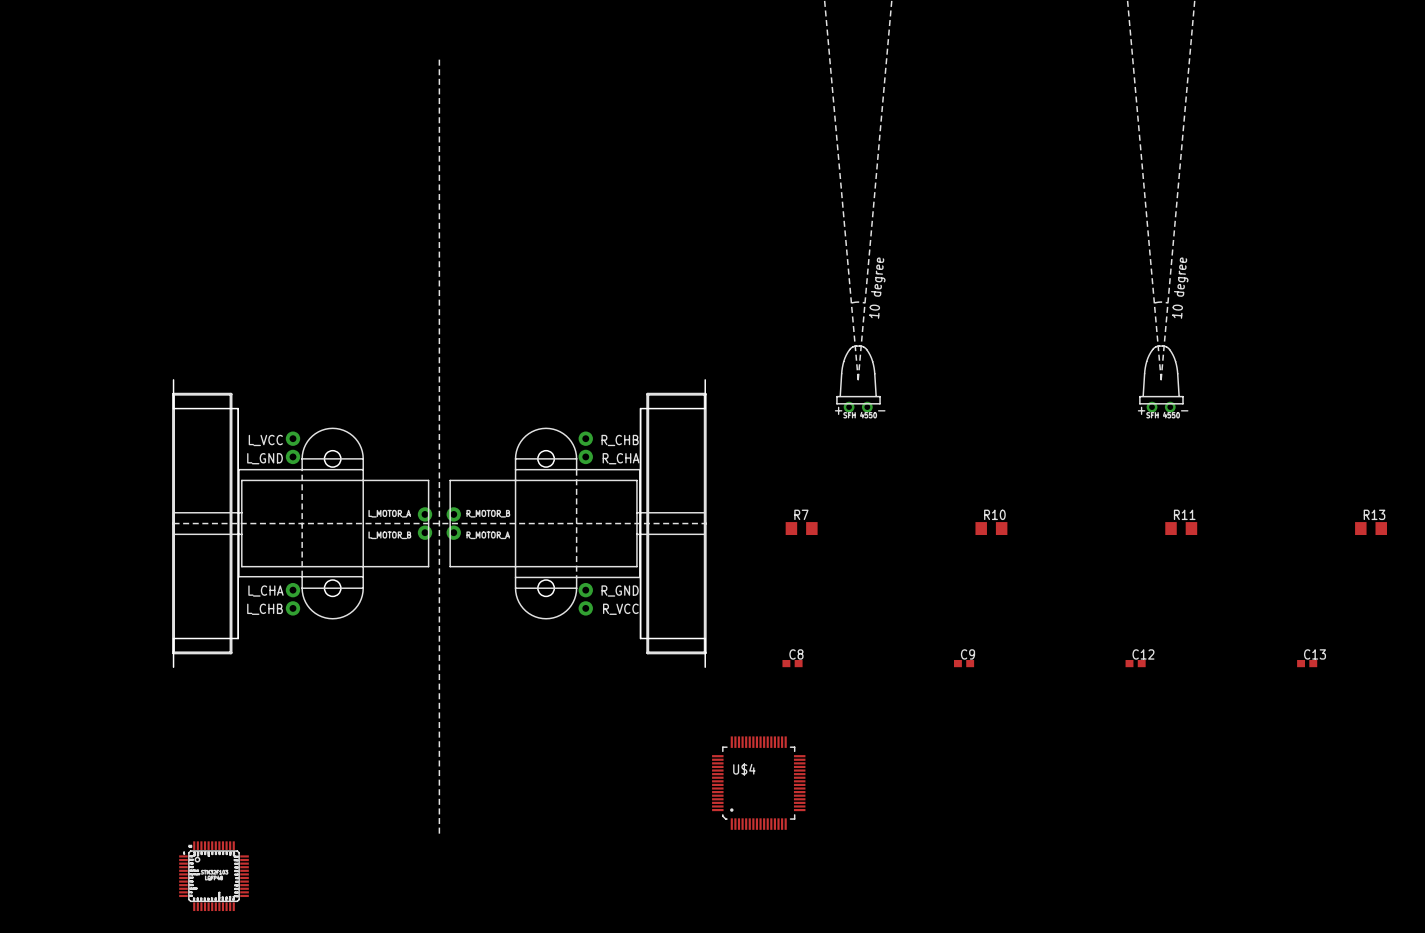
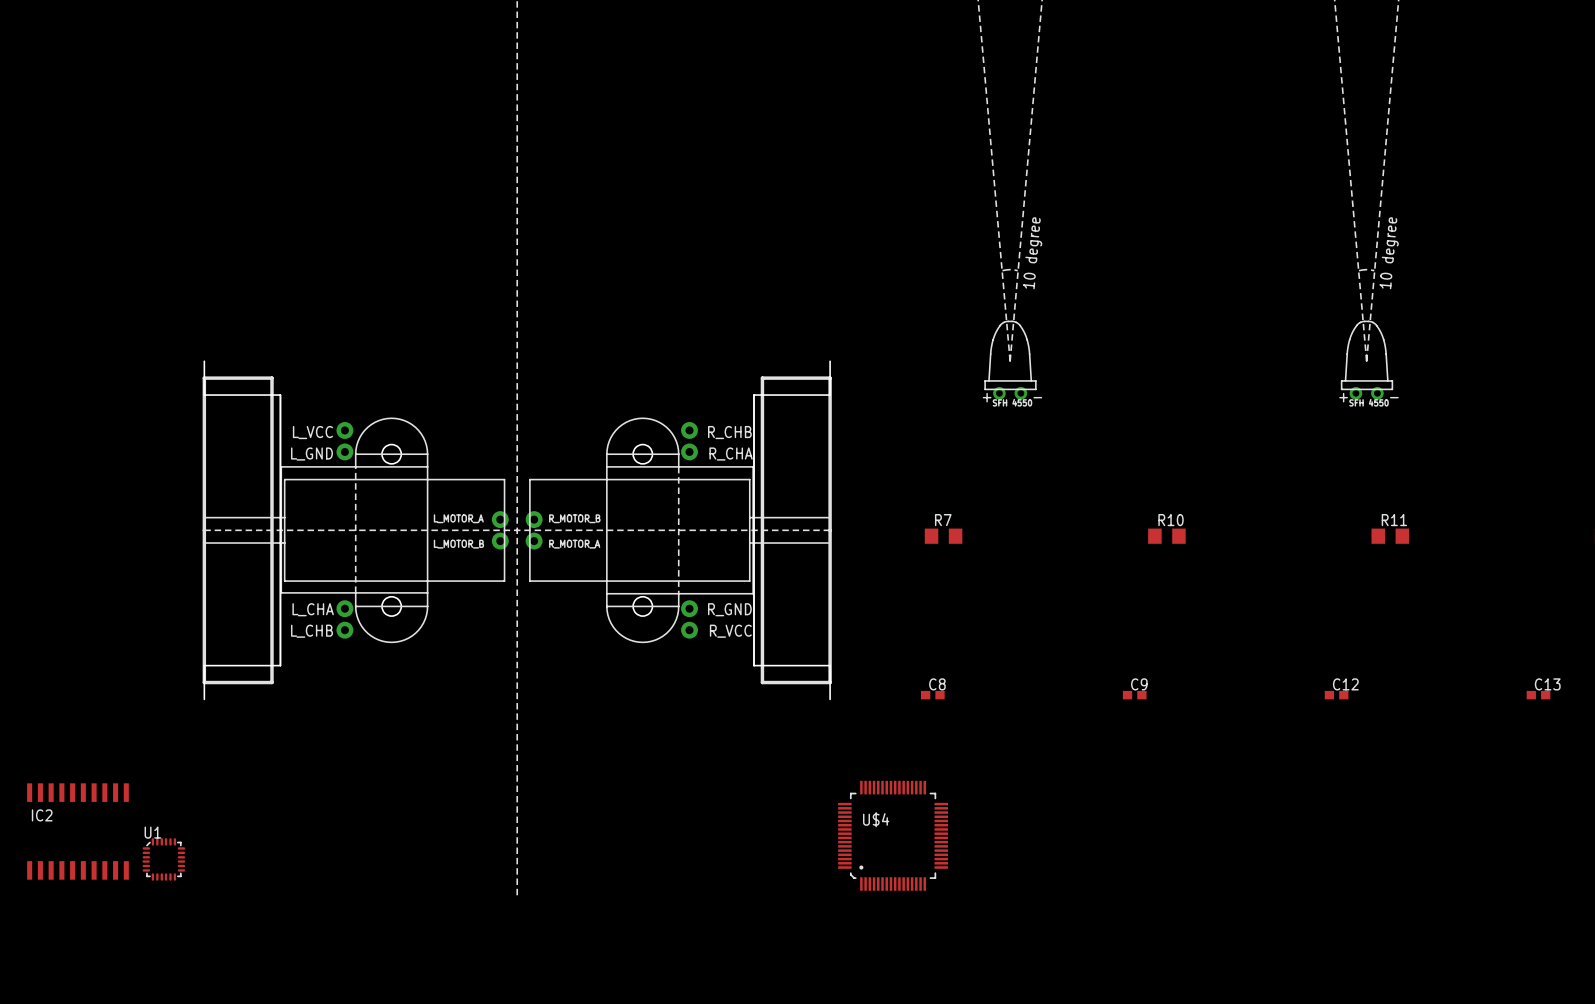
IC2: none -> (77, 831)
U1: none -> (163, 859)
part: (213, 876) -> none

